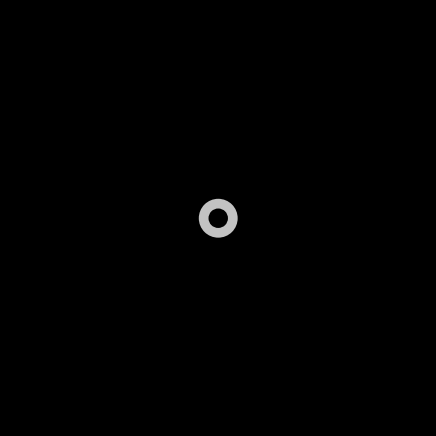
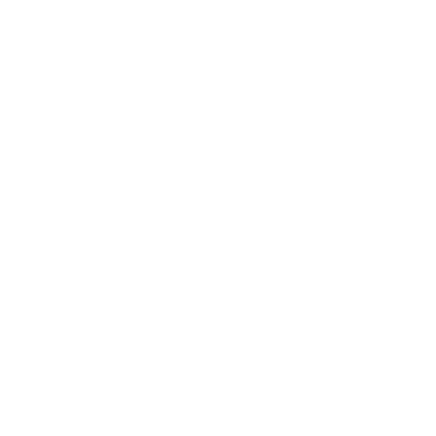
via: (218, 218) -> none

